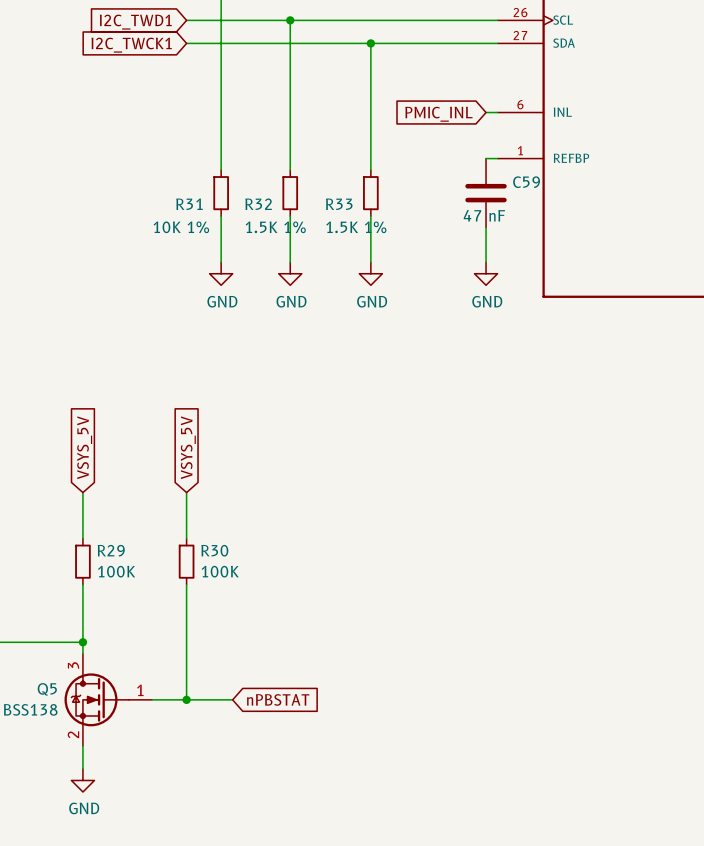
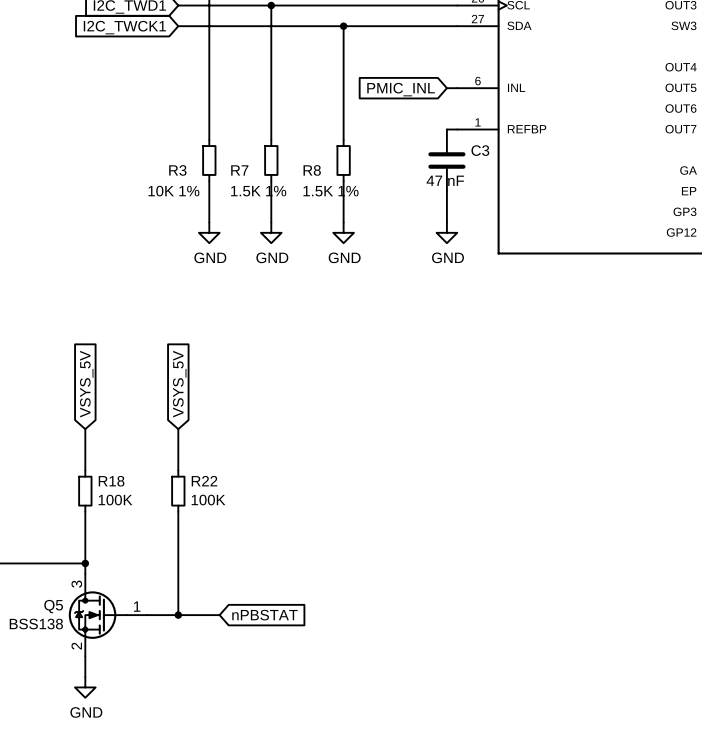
C59 name: C59 (526, 182) -> C3 (480, 150)
R31 name: R31 (189, 204) -> R3 (177, 170)
R32 name: R32 (258, 204) -> R7 (239, 170)
R33 name: R33 (339, 204) -> R8 (312, 170)
R29 name: R29 (111, 550) -> R18 (111, 481)
R30 name: R30 (214, 550) -> R22 (204, 481)

